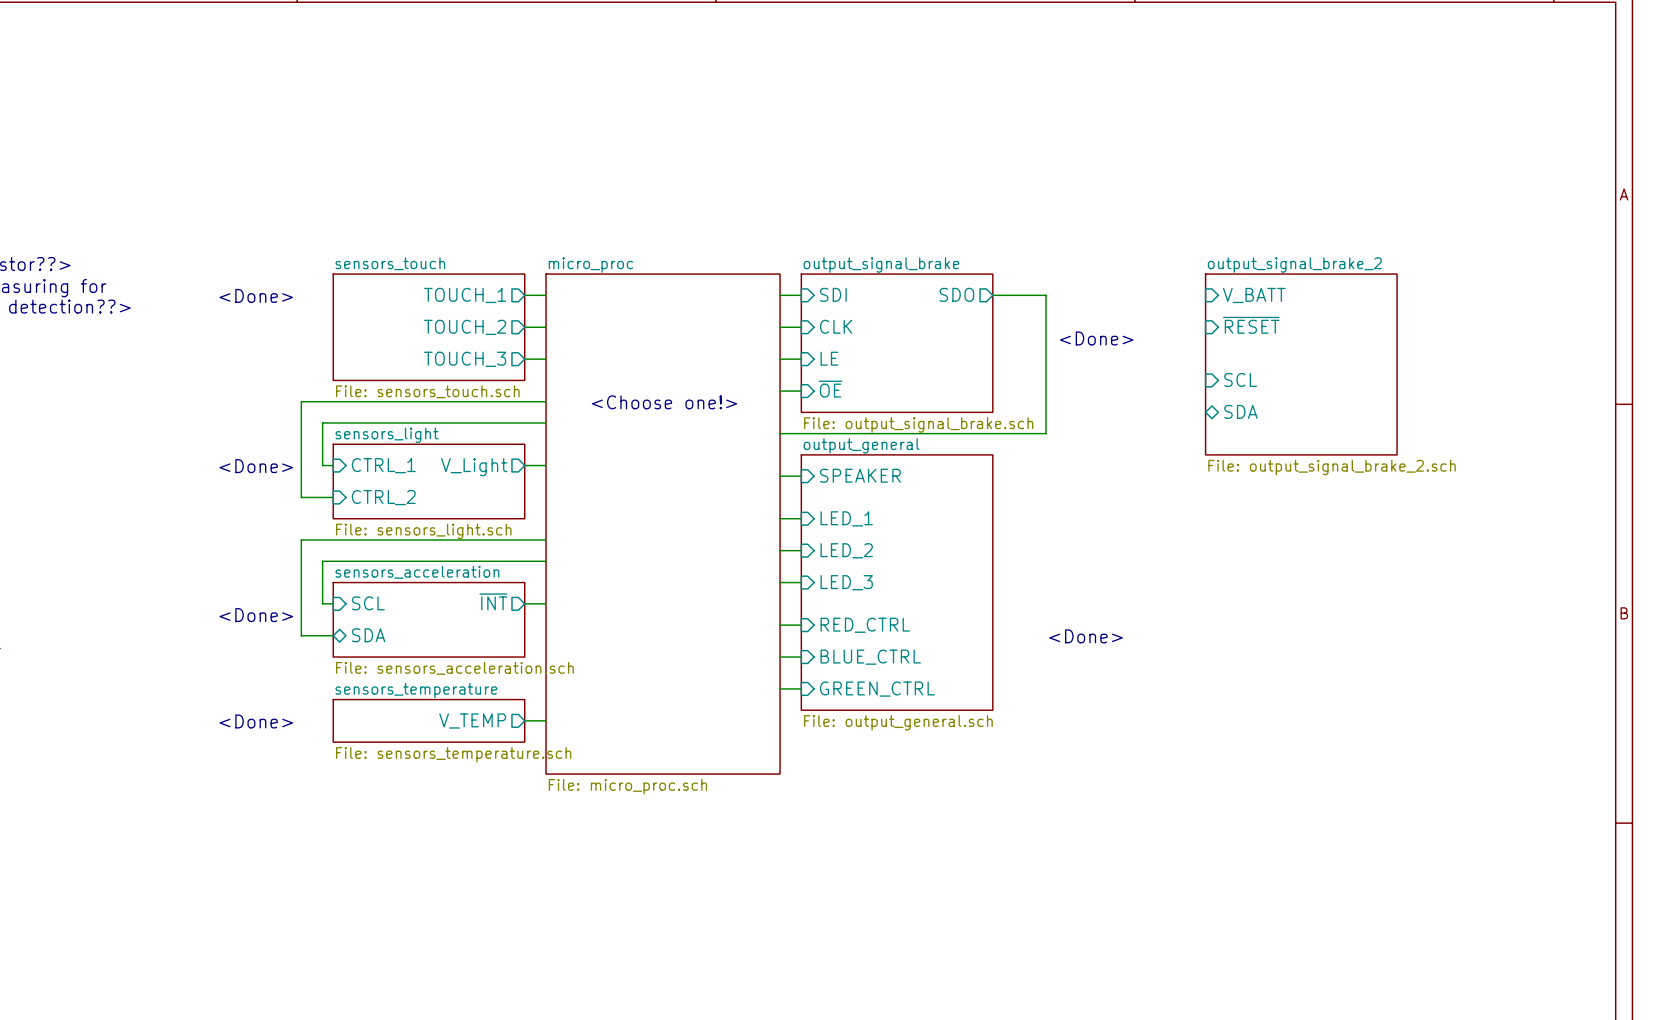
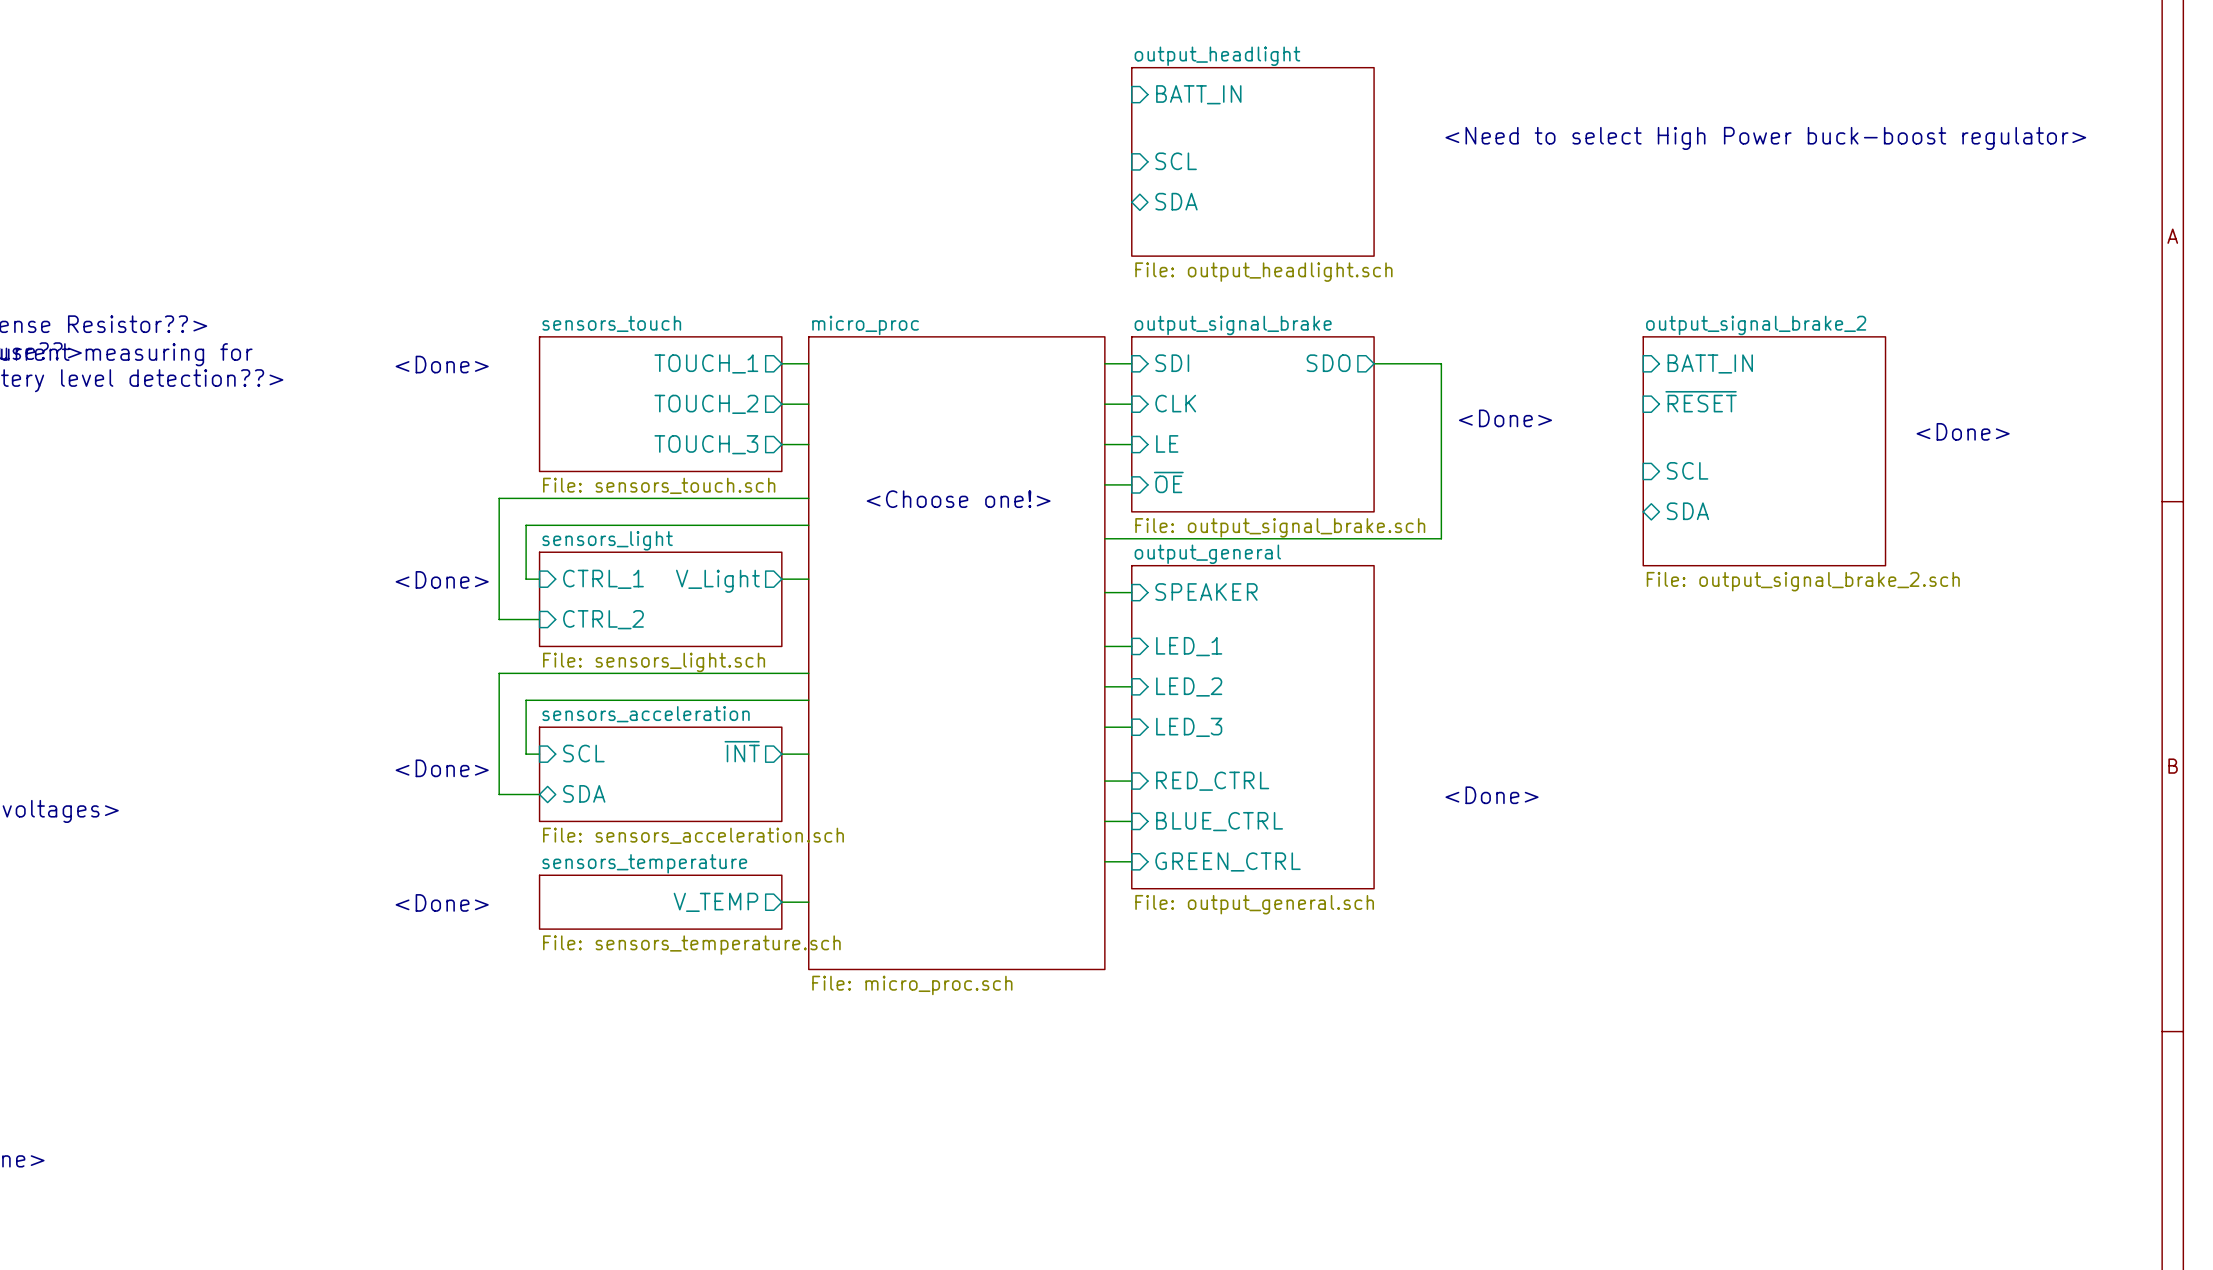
sheet pin: none -> BATT_IN (1198, 94)
text: none -> <Need to select High Power buck-boost regulator> (1765, 138)
sheet pin: none -> SCL (1176, 161)
sheet output_headlight: none -> File: output_headlight.sch (1252, 161)
sheet pin: none -> SDA (1176, 201)
sheet pin: V_BATT (1254, 295) -> BATT_IN (1710, 363)
text: none -> <Done> (1963, 431)

